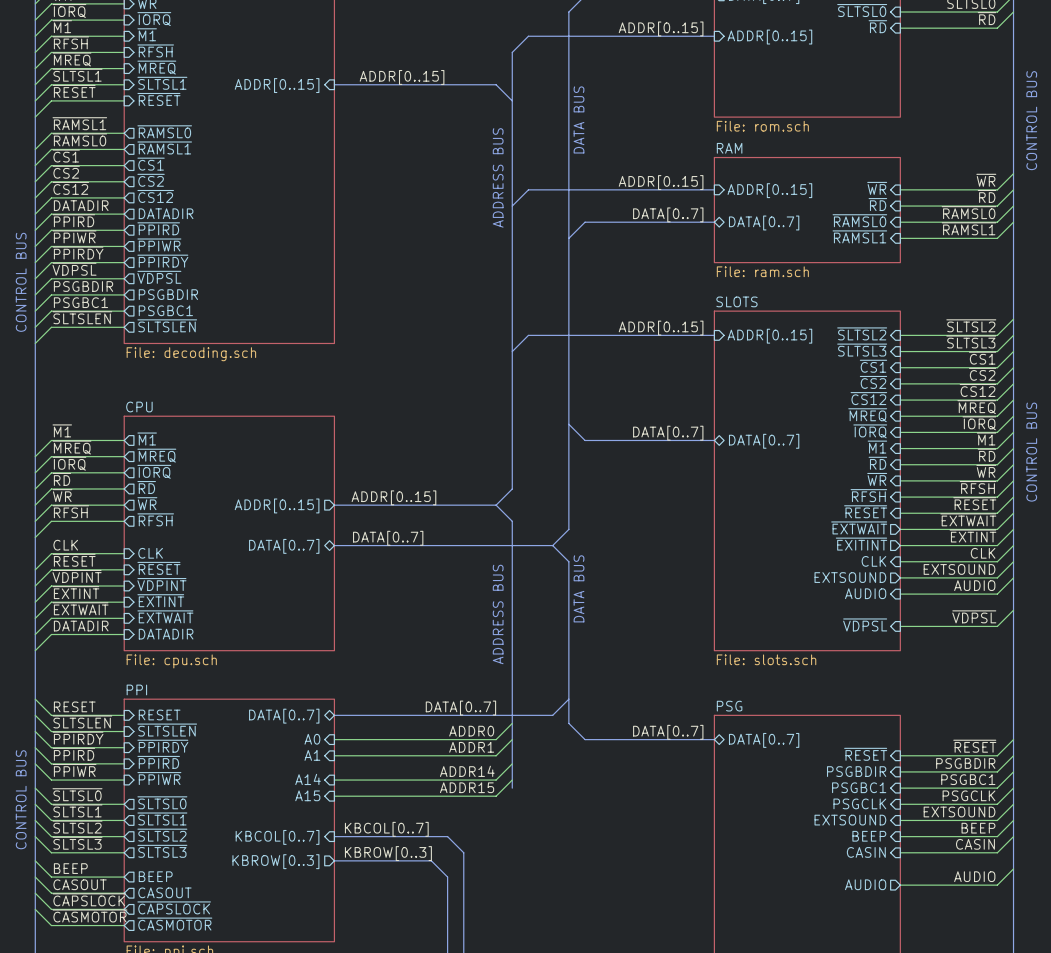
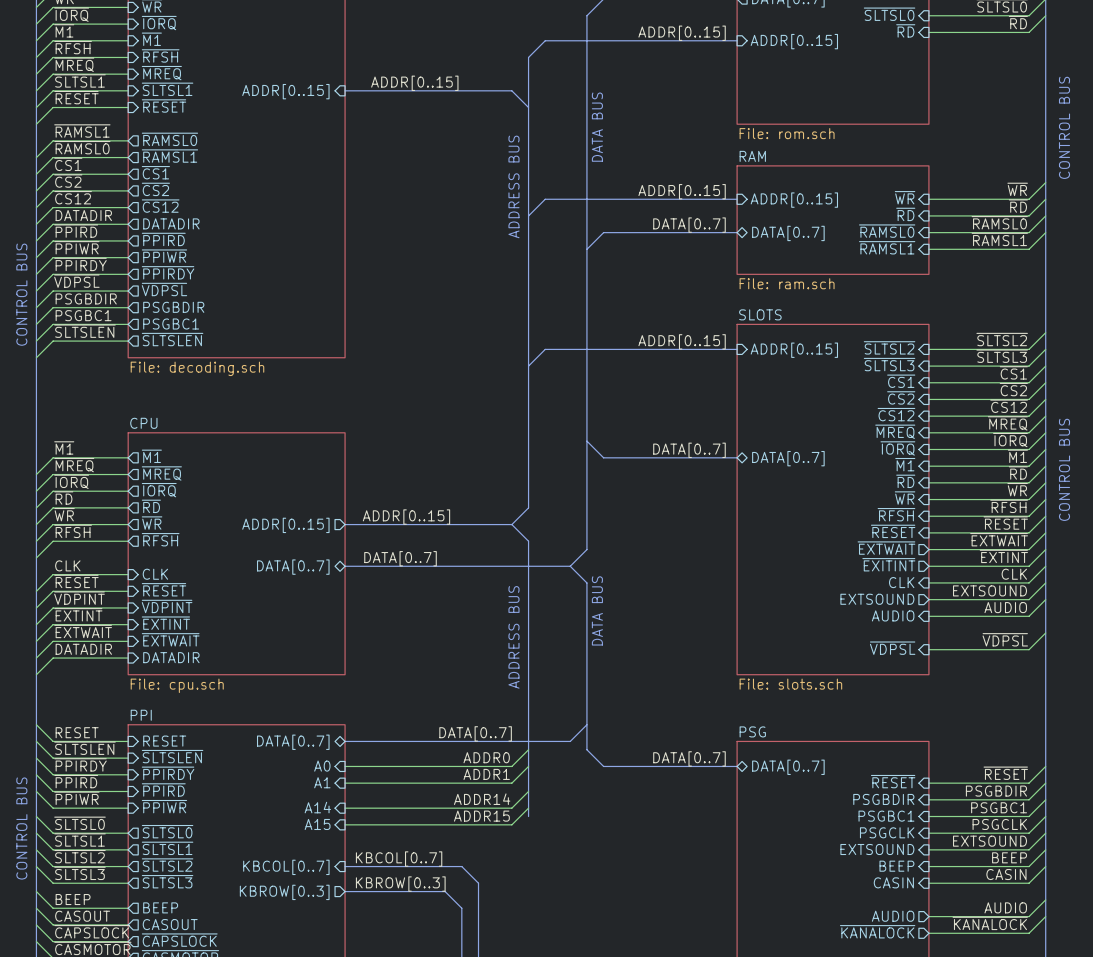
wire: none -> (1045, 916) (1029, 933) (928, 933)
label: none -> ~{KANALOCK} (990, 923)
sheet pin: none -> ~{KANALOCK} (877, 931)

